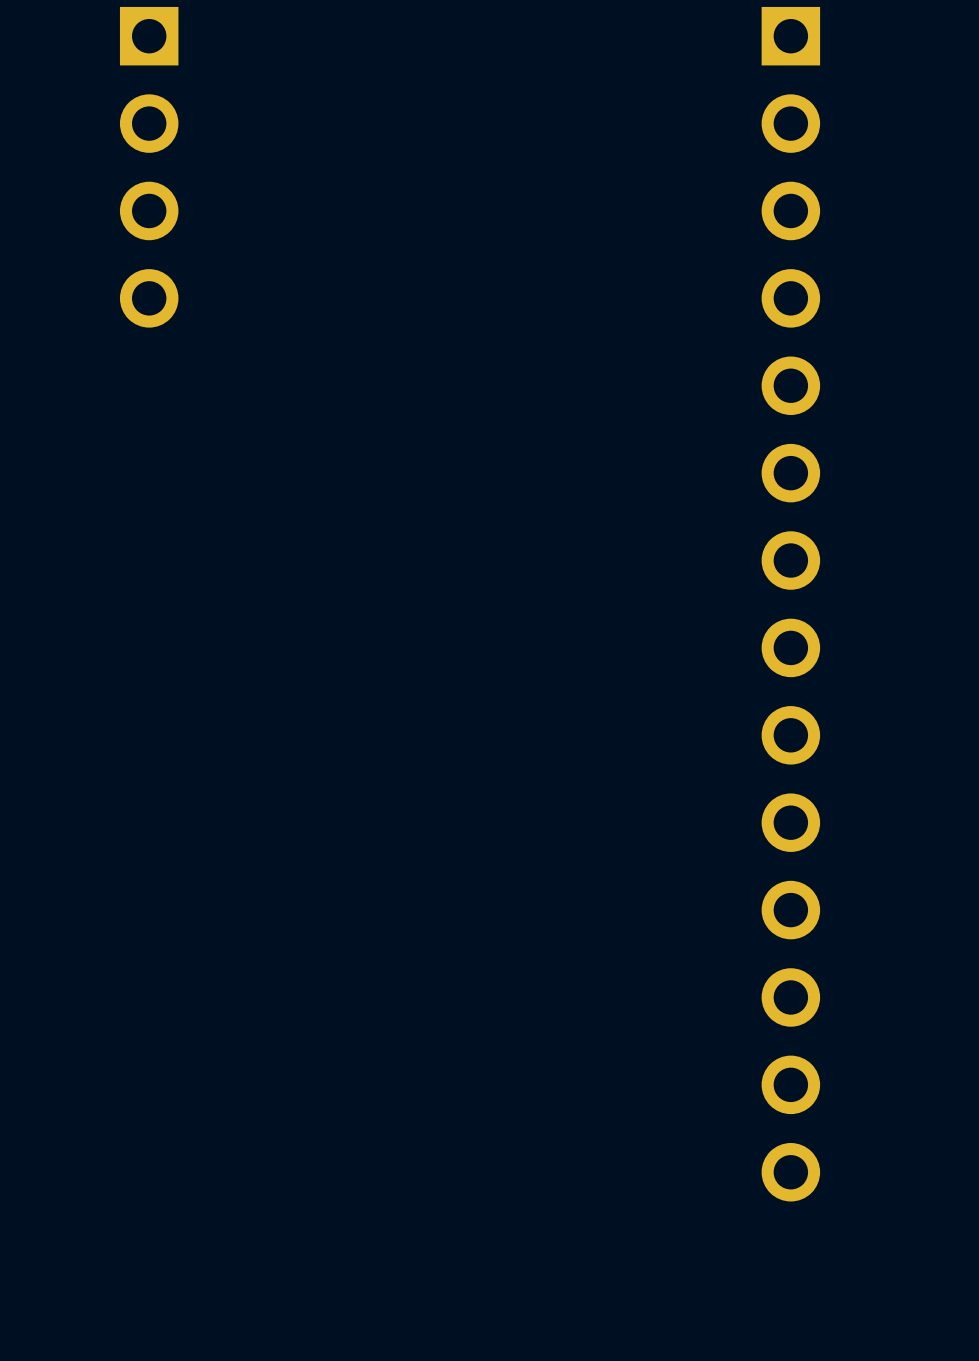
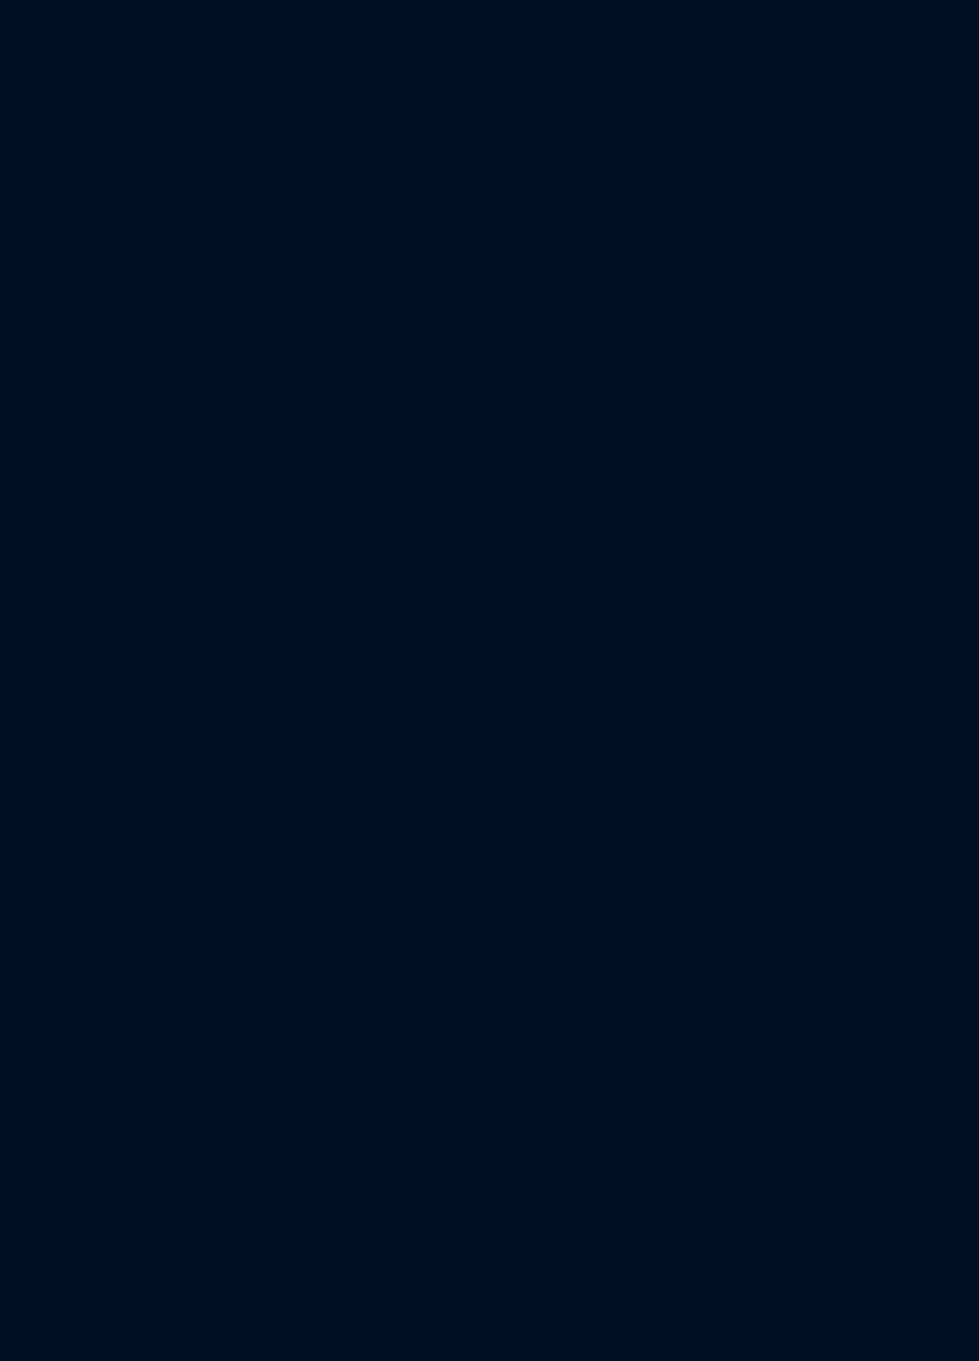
part: (149, 167) -> none
part: (790, 604) -> none

